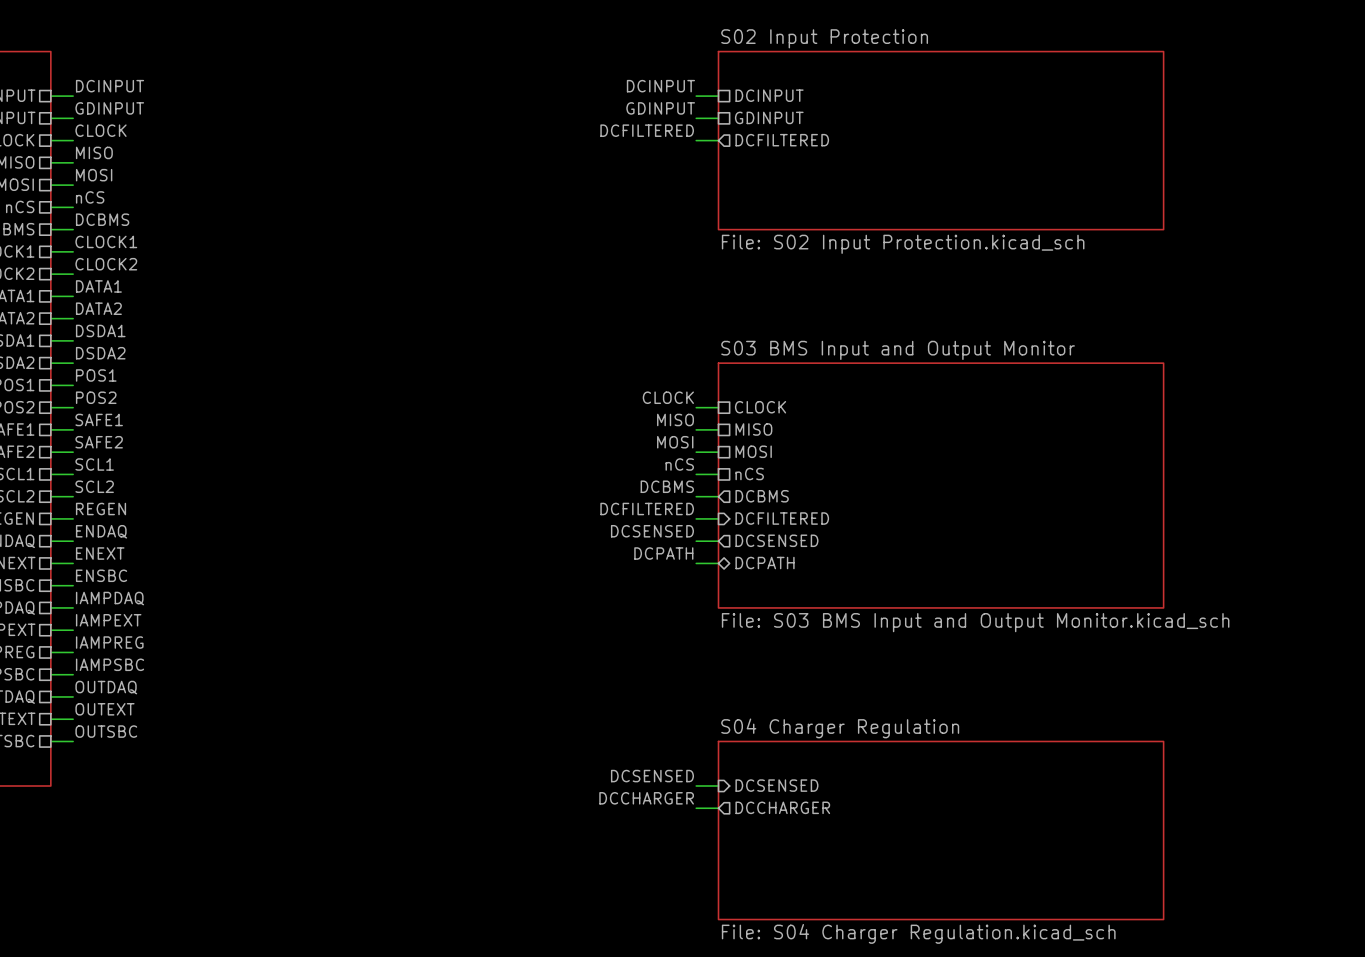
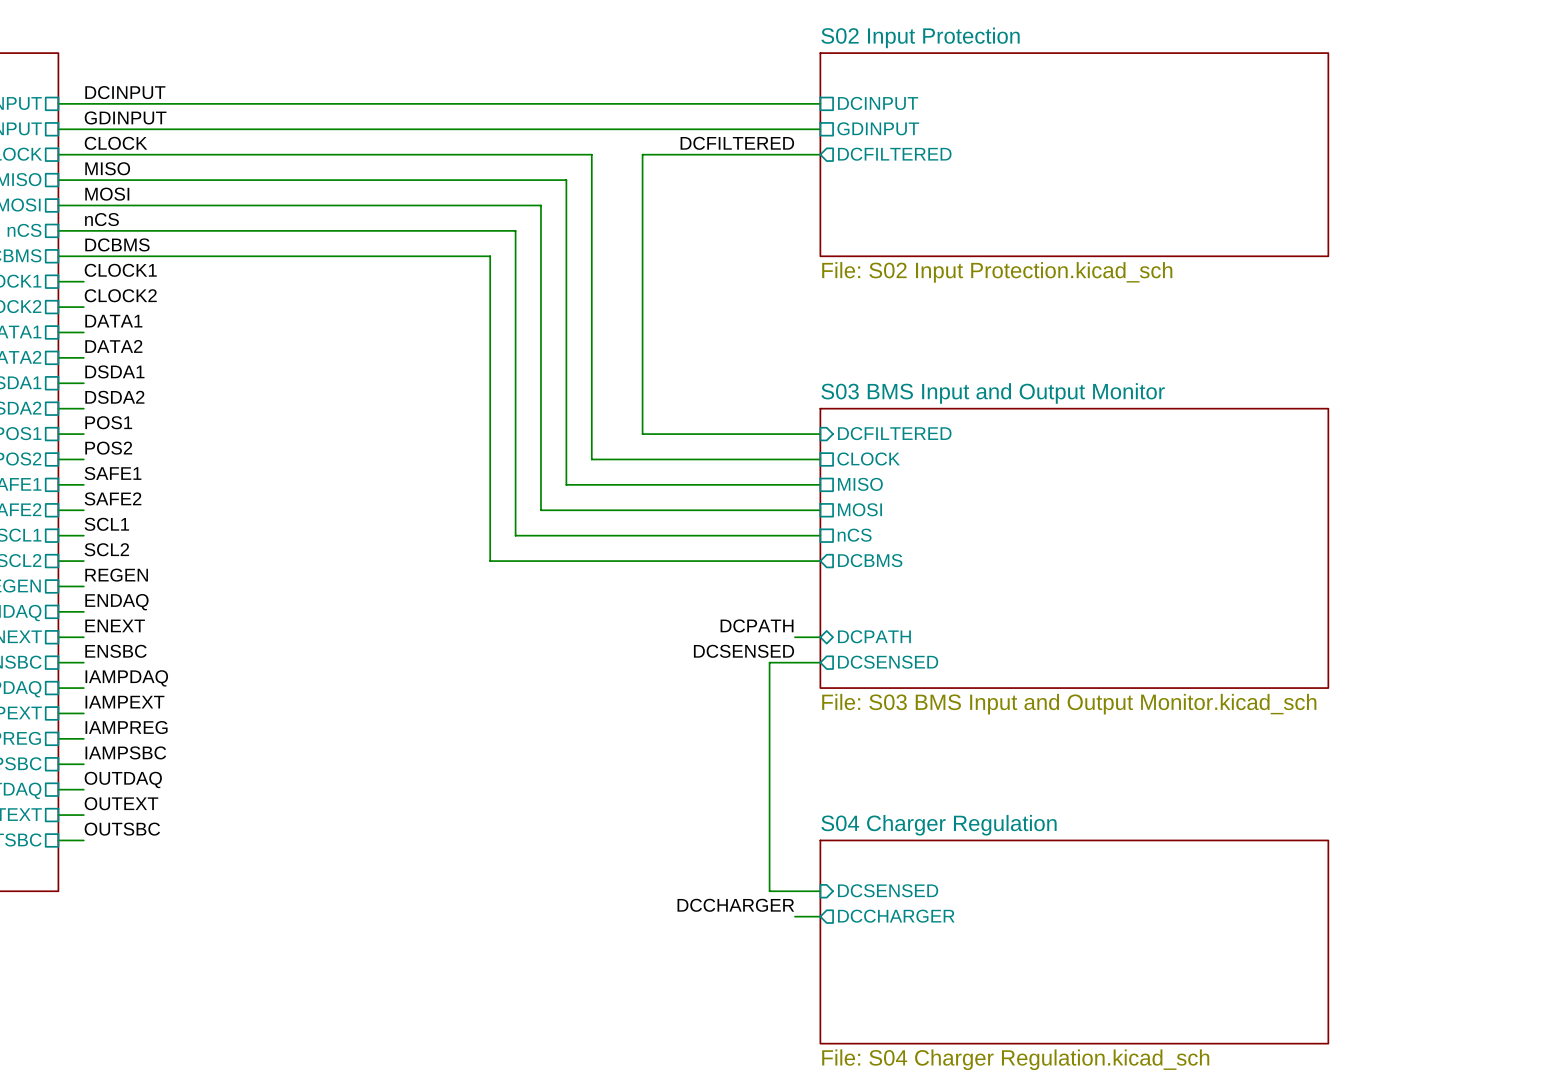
label: DCINPUT (660, 86) -> none
wire: none -> (83, 103) (794, 103)
label: GDINPUT (660, 108) -> none
wire: none -> (83, 129) (794, 129)
wire: none -> (83, 154) (591, 154) (591, 459) (794, 459)
wire: none -> (794, 154) (642, 154) (642, 434) (820, 434)
wire: none -> (83, 180) (566, 180) (566, 484) (794, 484)
wire: none -> (83, 205) (540, 205) (540, 510) (794, 510)
wire: none -> (83, 230) (515, 230) (515, 535) (794, 535)
wire: none -> (83, 256) (490, 256) (490, 561) (794, 561)
label: CLOCK (668, 397) -> none
label: MISO (675, 419) -> none
label: MOSI (675, 442) -> none
label: nCS (679, 464) -> none
label: DCBMS (667, 486) -> none
label: DCFILTERED (647, 509) -> none
wire: (696, 518) (718, 518) -> none
sheet pin position: DCFILTERED (782, 518) -> DCFILTERED (894, 433)
label position: DCSENSED (652, 531) -> DCSENSED (744, 651)
sheet pin position: DCSENSED (776, 540) -> DCSENSED (888, 662)
wire: (696, 541) (718, 541) -> none
wire: none -> (820, 662) (769, 662) (769, 891) (794, 891)
label: DCSENSED (652, 776) -> none

